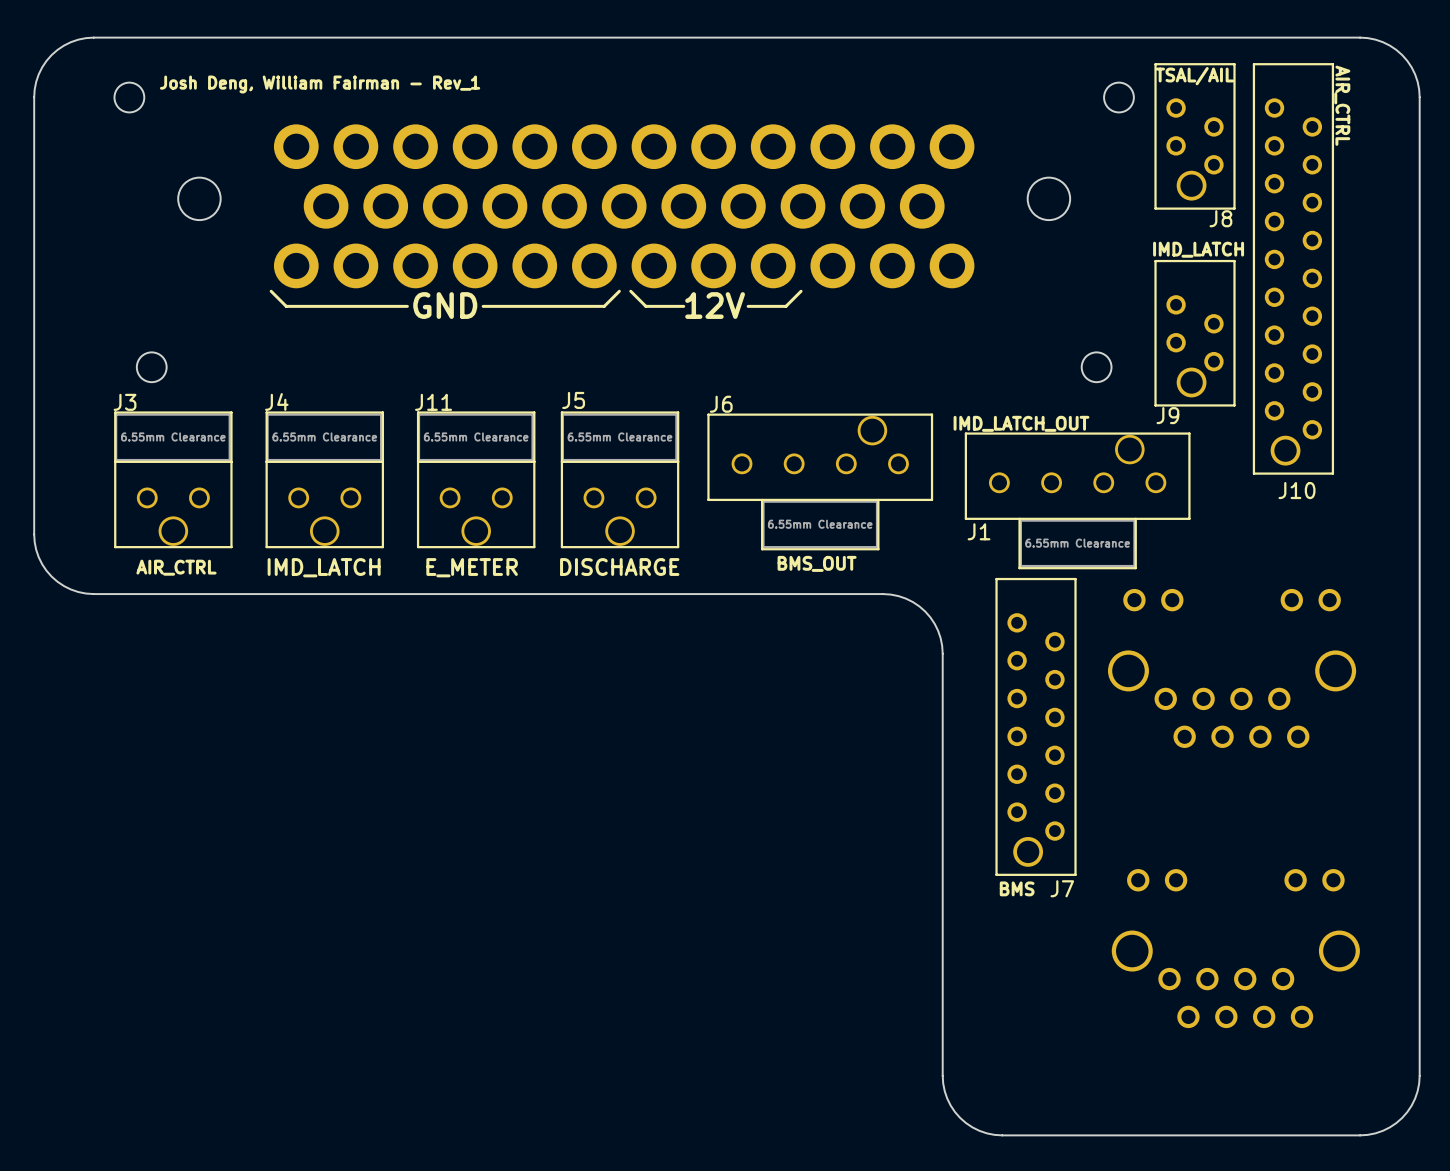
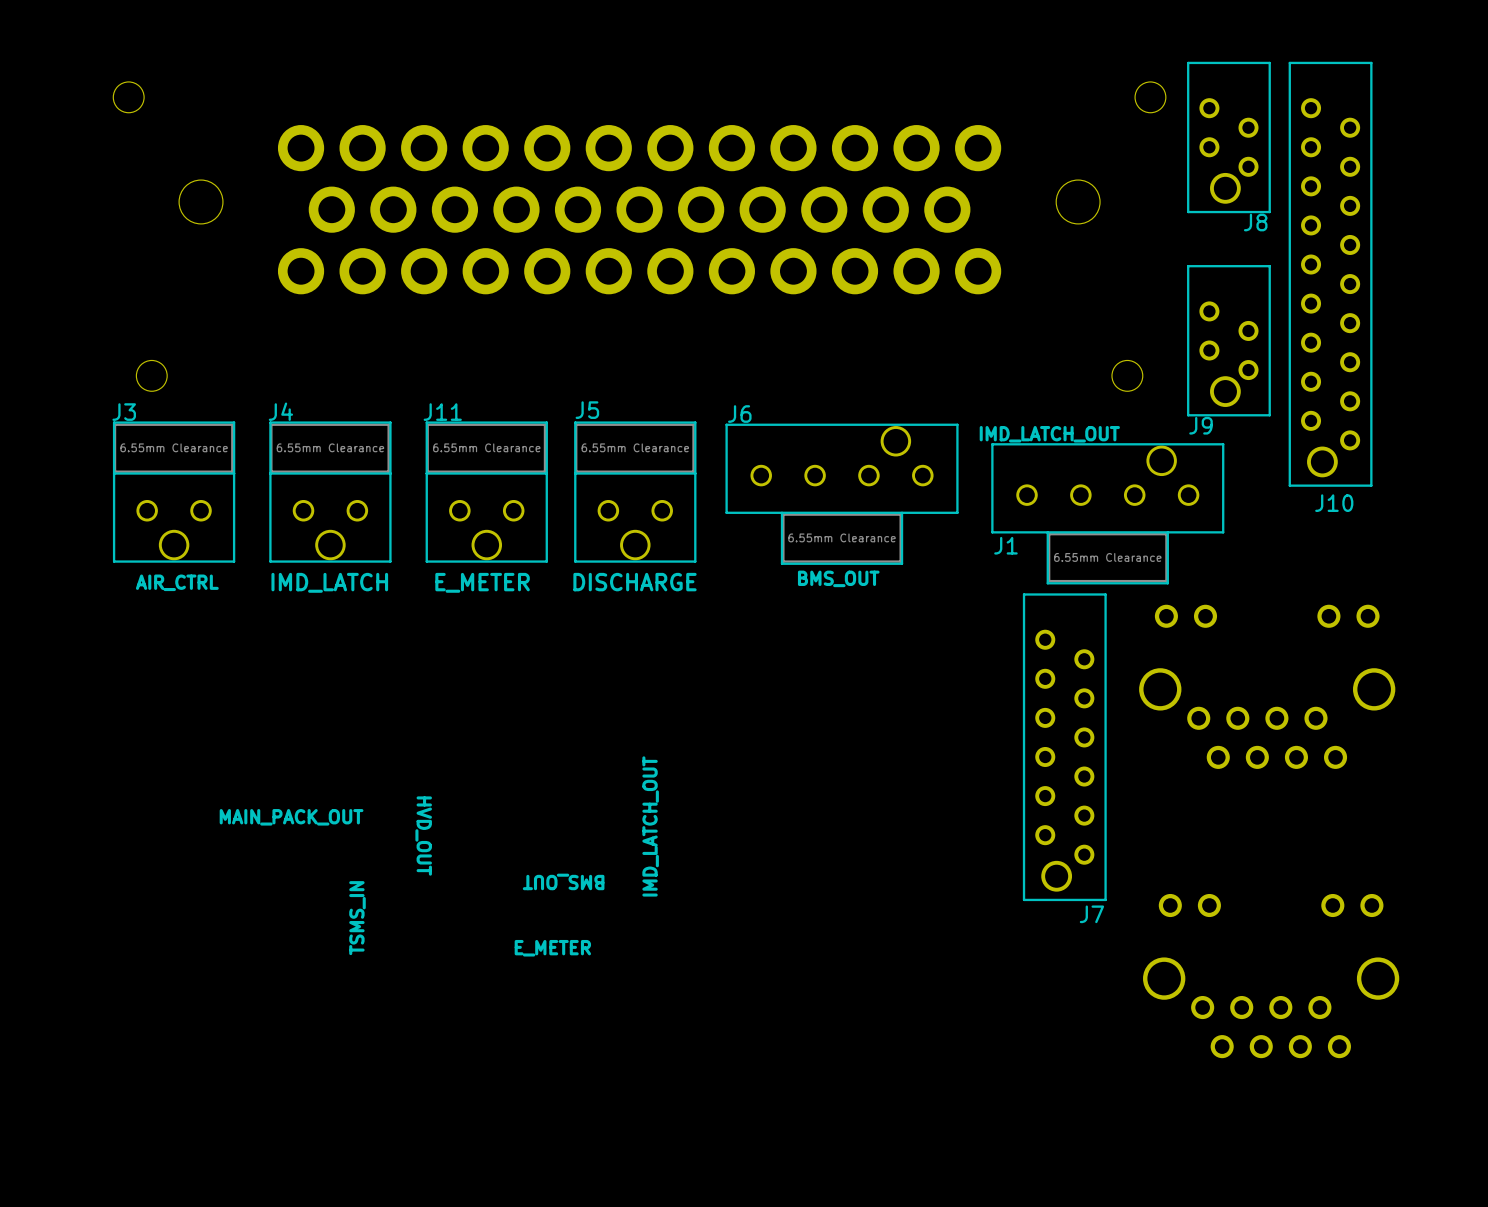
board edge: (1360, 37) (93, 37) (71, 42) (57, 49) (46, 60) (38, 74) (34, 97) (34, 534) (38, 557) (46, 570) (57, 581) (71, 589) (93, 594) (883, 594) (905, 598) (919, 606) (930, 617) (938, 630) (942, 645) (942, 1075) (947, 1098) (960, 1117) (979, 1130) (1002, 1135) (1360, 1135) (1382, 1130) (1396, 1123) (1407, 1112) (1415, 1098) (1419, 1075) (1419, 97) (1415, 74) (1402, 55) (1382, 42) (1360, 37) -> none
text: TSAL/AIL (1194, 76) -> none
text: Josh Deng, William Fairman - Rev_1 (320, 84) -> none
text: AIR_CTRL (1342, 105) -> none
text: IMD_LATCH (1198, 249) -> none
line: (271, 291) (286, 306) (407, 306) -> none
line: (619, 291) (604, 306) (483, 306) -> none
line: (630, 291) (645, 306) (683, 306) -> none
line: (801, 291) (785, 306) (748, 306) -> none
text: GND (445, 305) -> none
text: 12V (715, 305) -> none
text: none -> MAIN_PACK_OUT (291, 817)
text: none -> IMD_LATCH_OUT (650, 826)
text: none -> HVD_OUT (423, 836)
text: none -> BMS_OUT (563, 881)
text: BMS (1017, 888) -> none
text: none -> TSMS_IN (357, 918)
text: none -> E_METER (552, 948)

